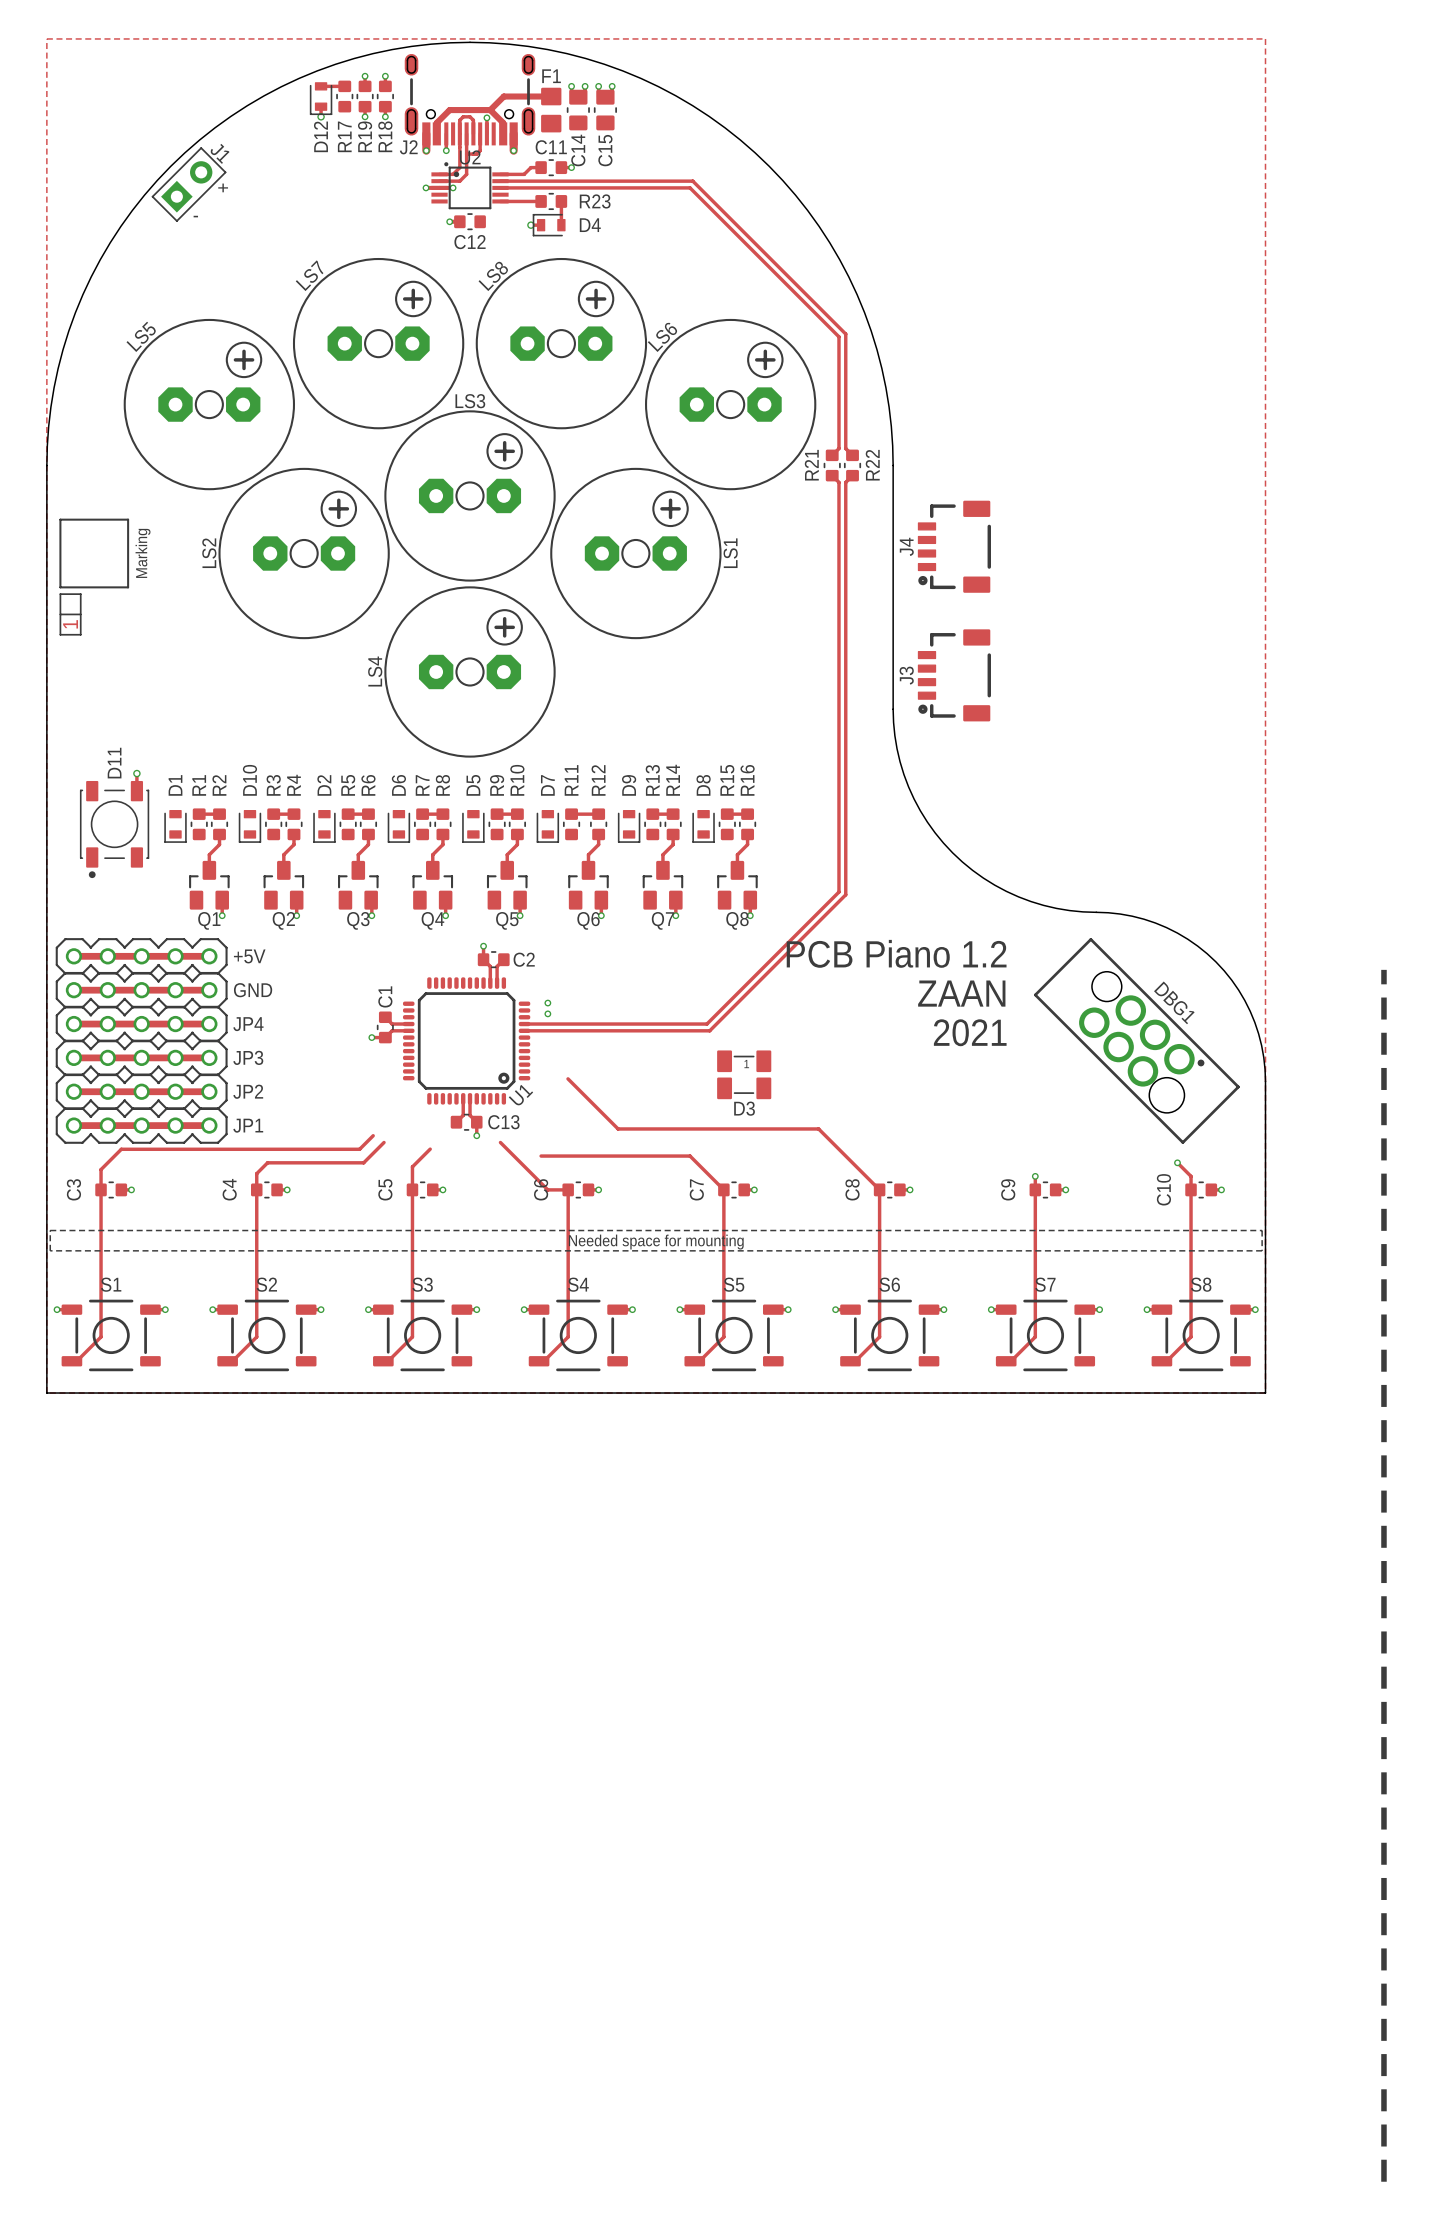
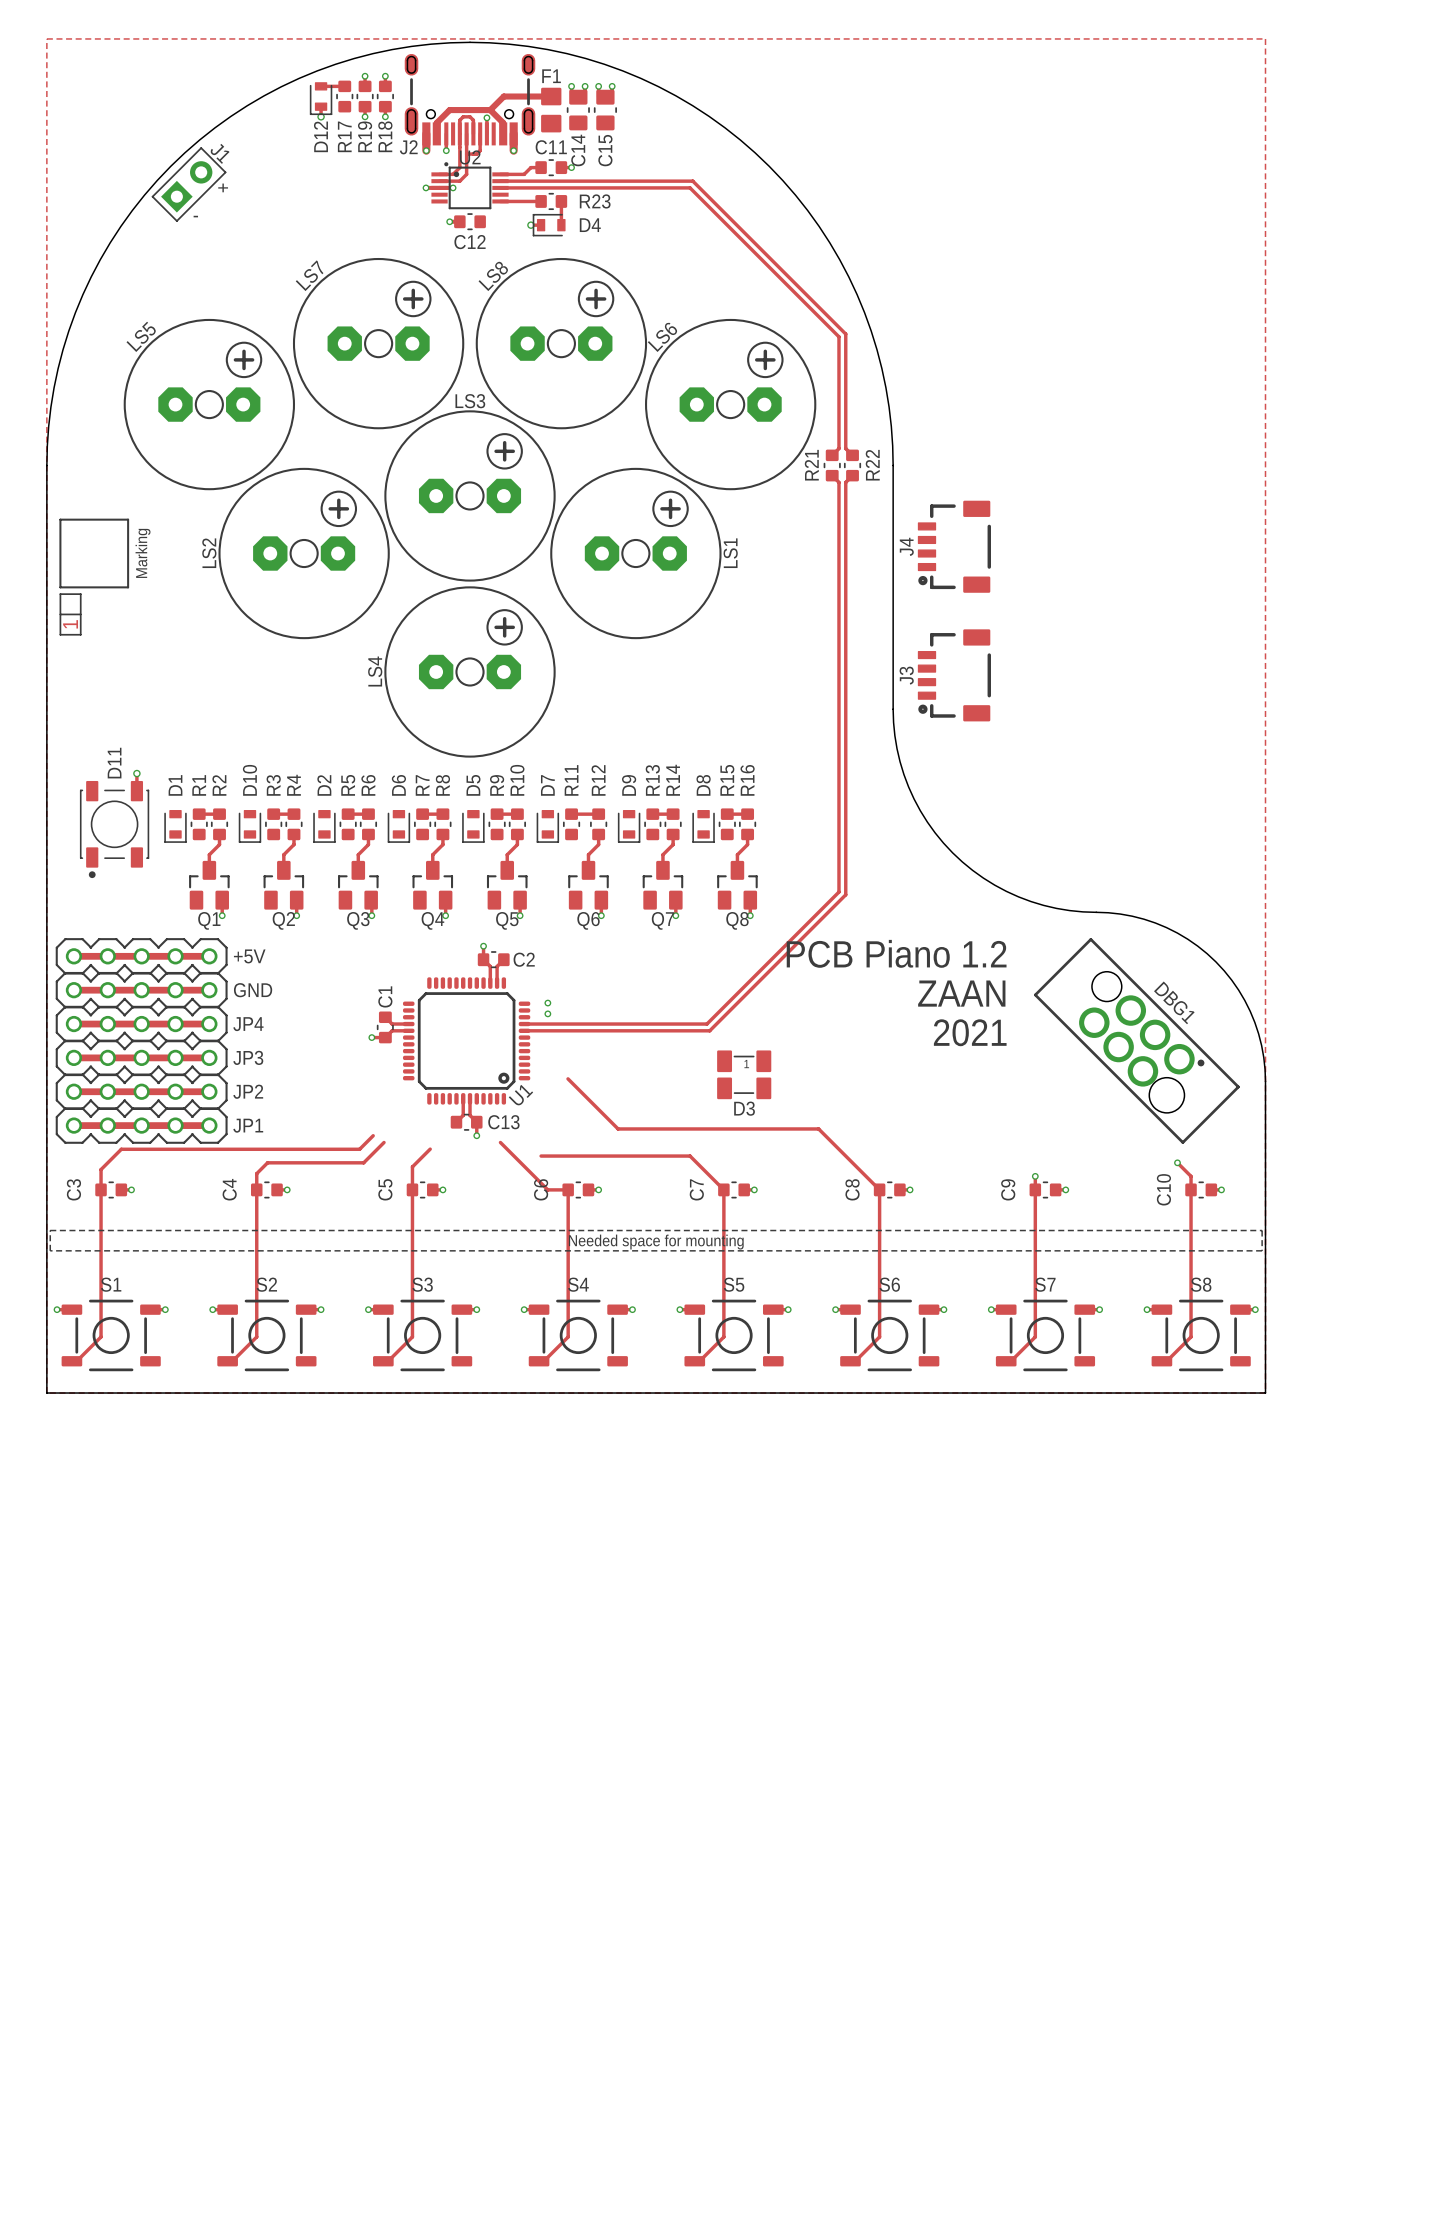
line: (1383, 969) (1383, 2181) -> none

